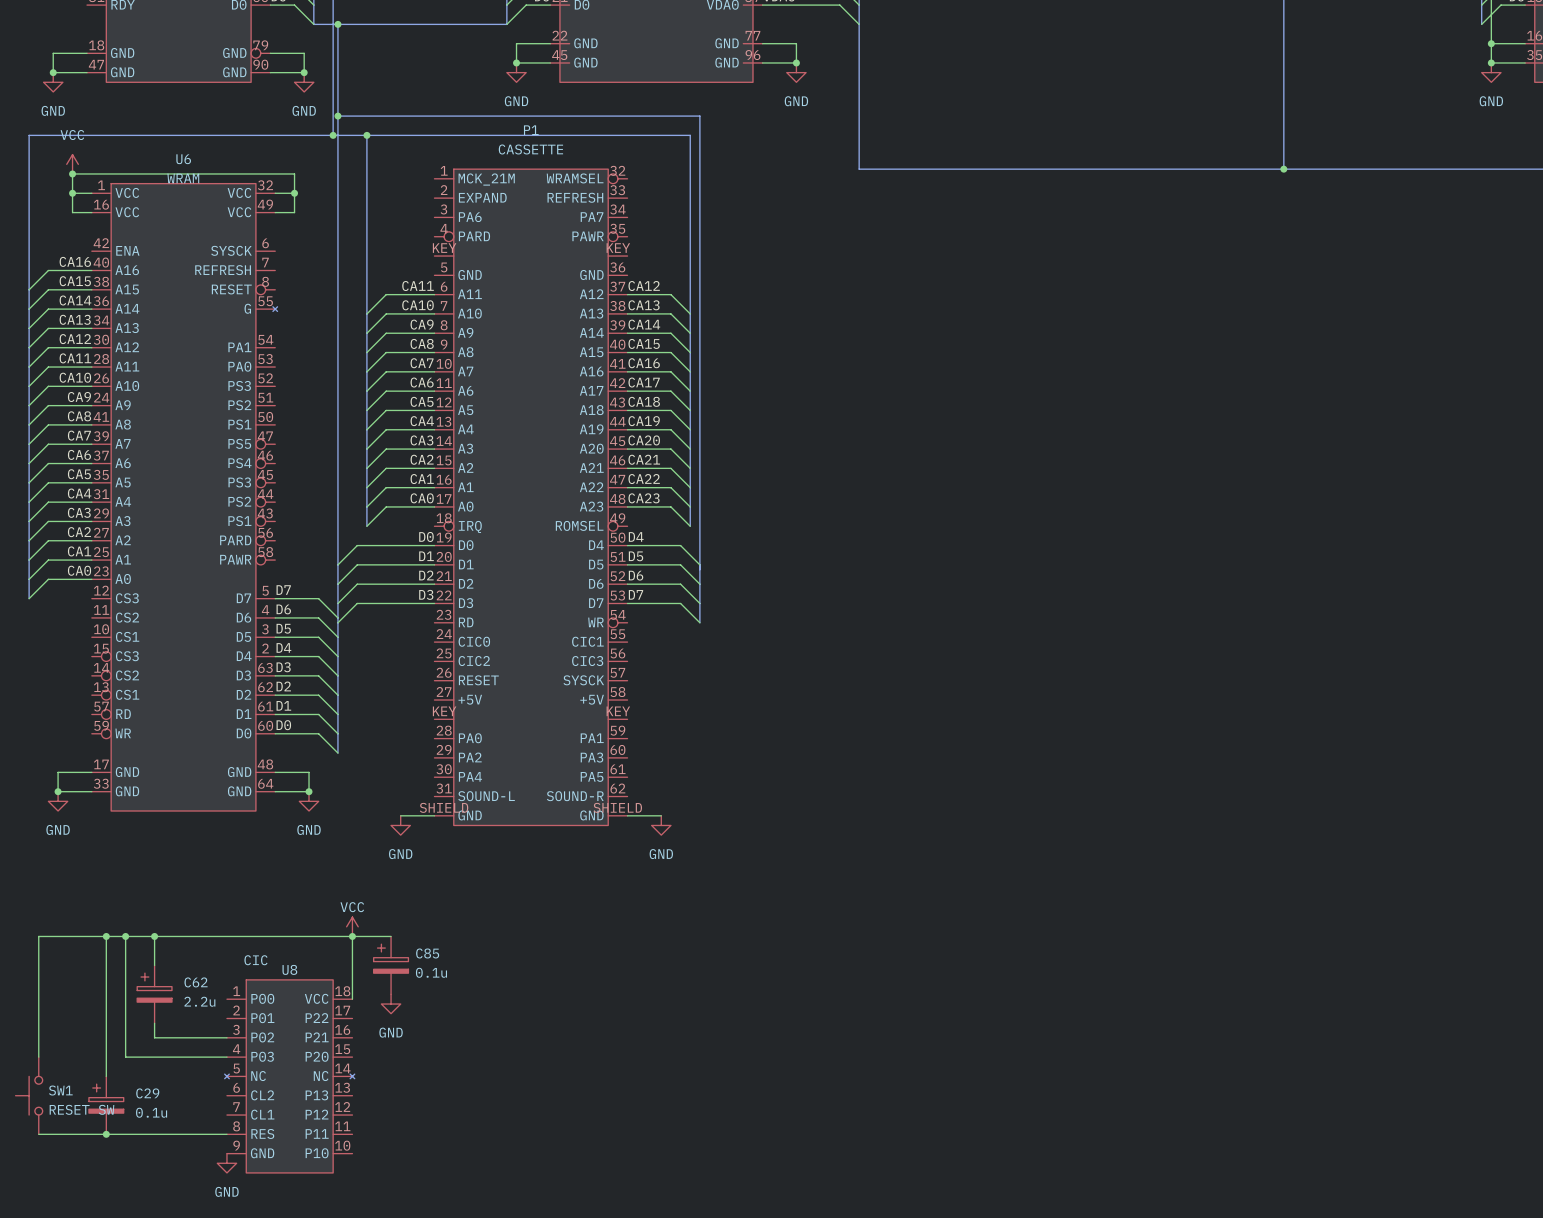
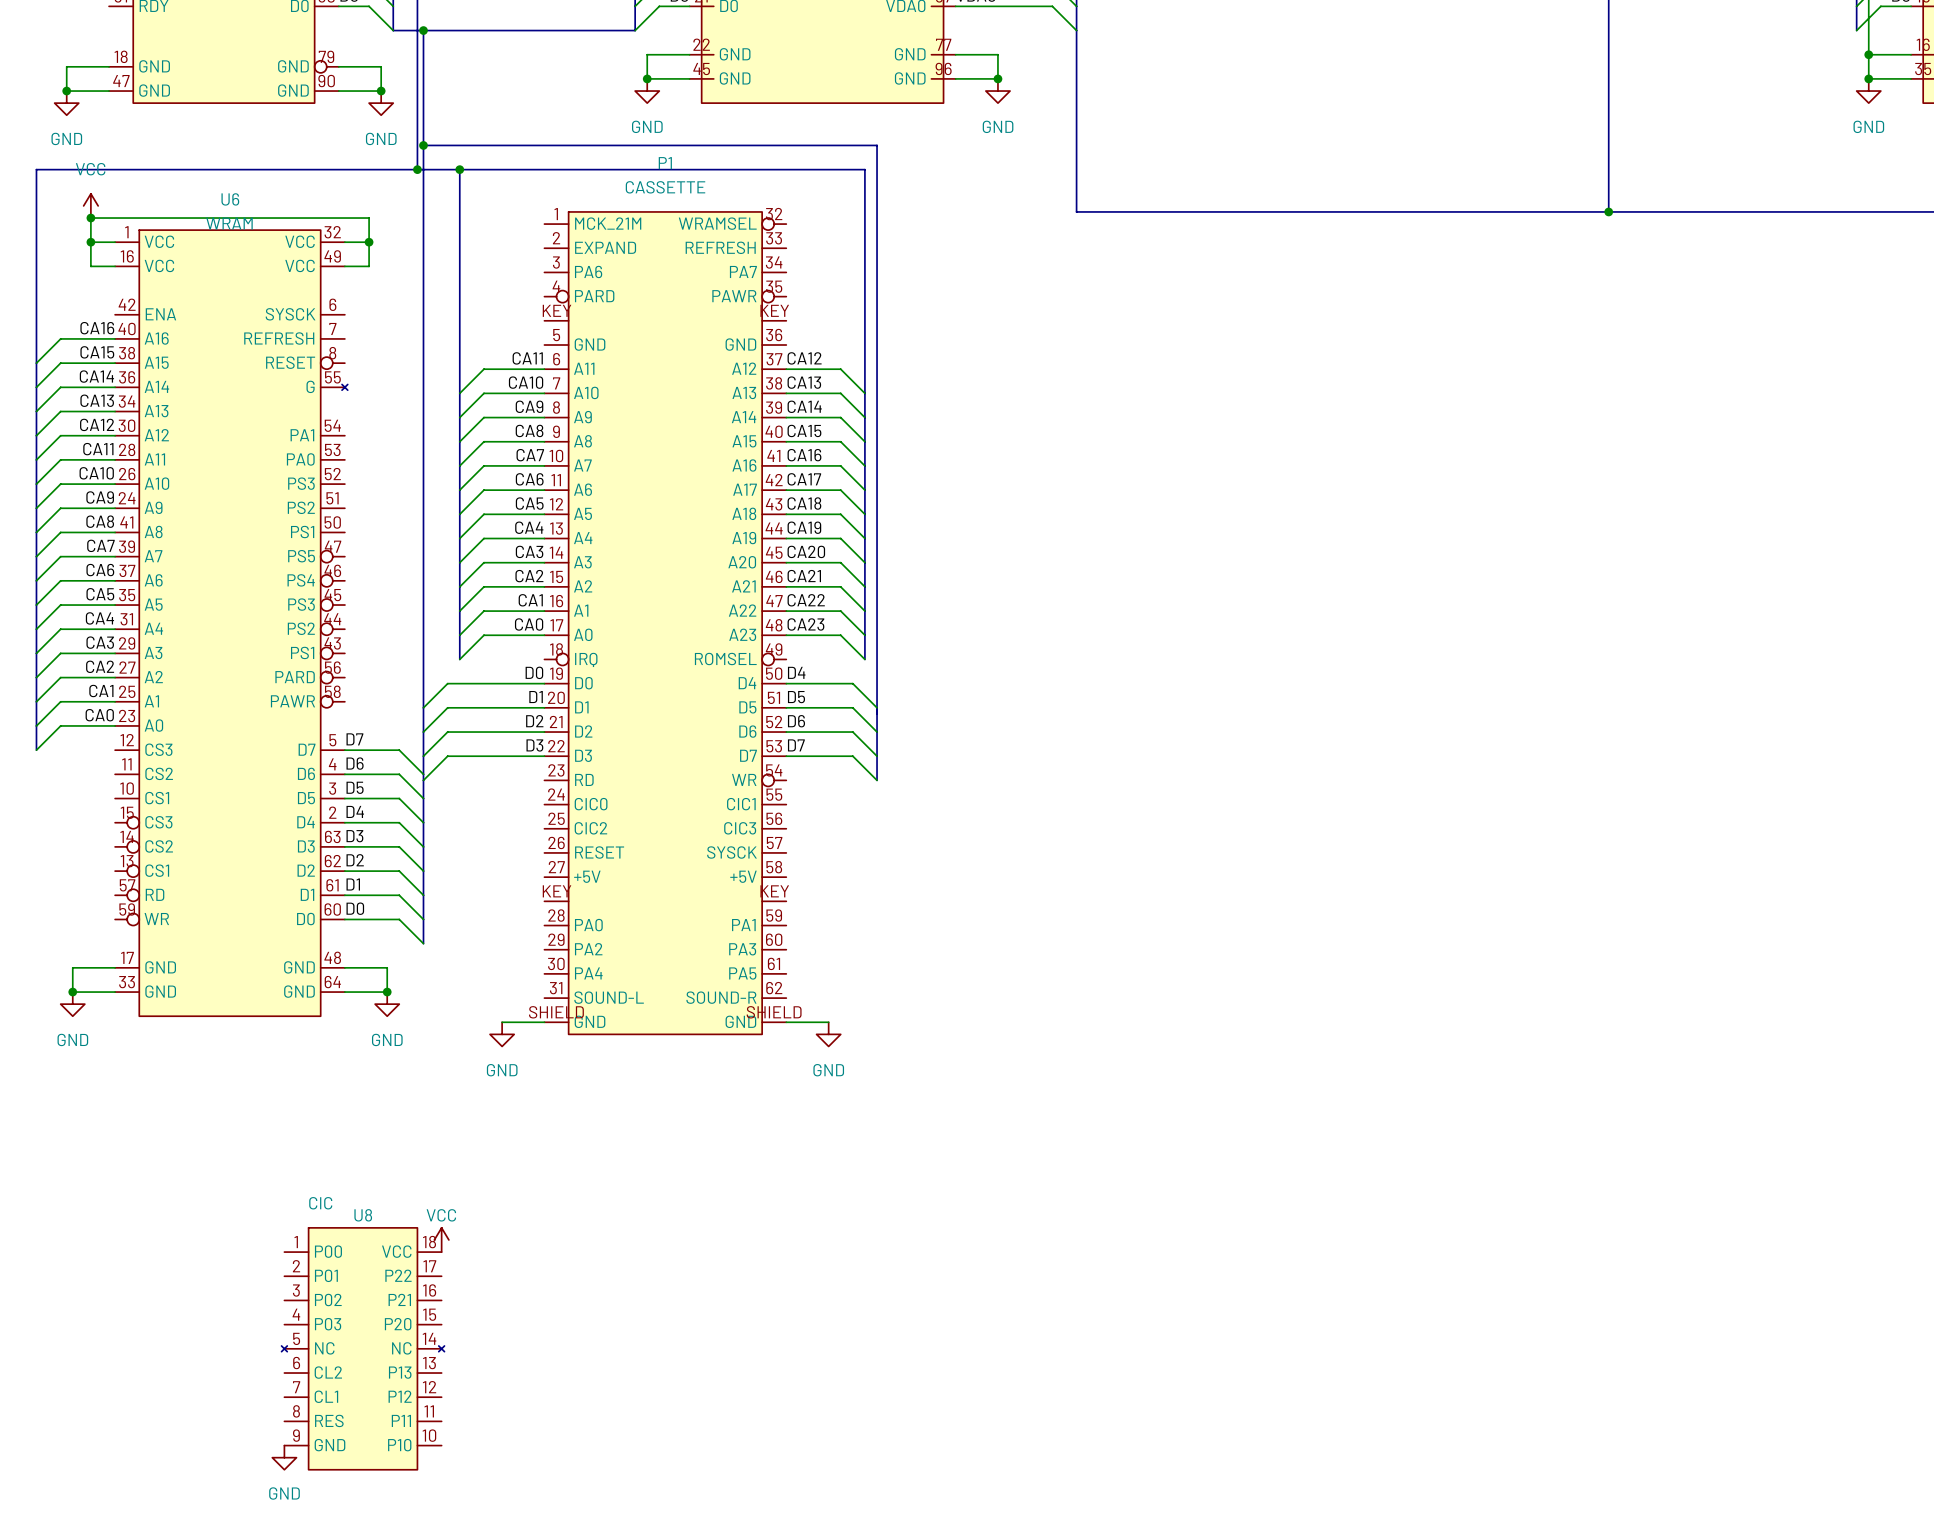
power symbol position: VCC (352, 926) -> VCC (441, 1239)
wire: (106, 936) (106, 1076) -> none
junction: (106, 936) -> none
wire: (125, 936) (125, 1057) (226, 1057) -> none
junction: (125, 936) -> none
wire: (154, 936) (154, 965) -> none
junction: (154, 936) -> none
wire: (352, 936) (352, 999) -> none
junction: (352, 936) -> none
wire: (391, 936) (38, 936) (38, 1057) -> none
C85: 0.1u (391, 965) -> none
C62: 2.2u (154, 994) -> none
power symbol: GND (391, 1004) -> none
wire: (154, 1023) (154, 1037) (226, 1037) -> none
SW1: RESET SW (29, 1095) -> none
C29: 0.1u (106, 1105) -> none
wire: (38, 1134) (226, 1134) -> none
junction: (106, 1134) -> none

